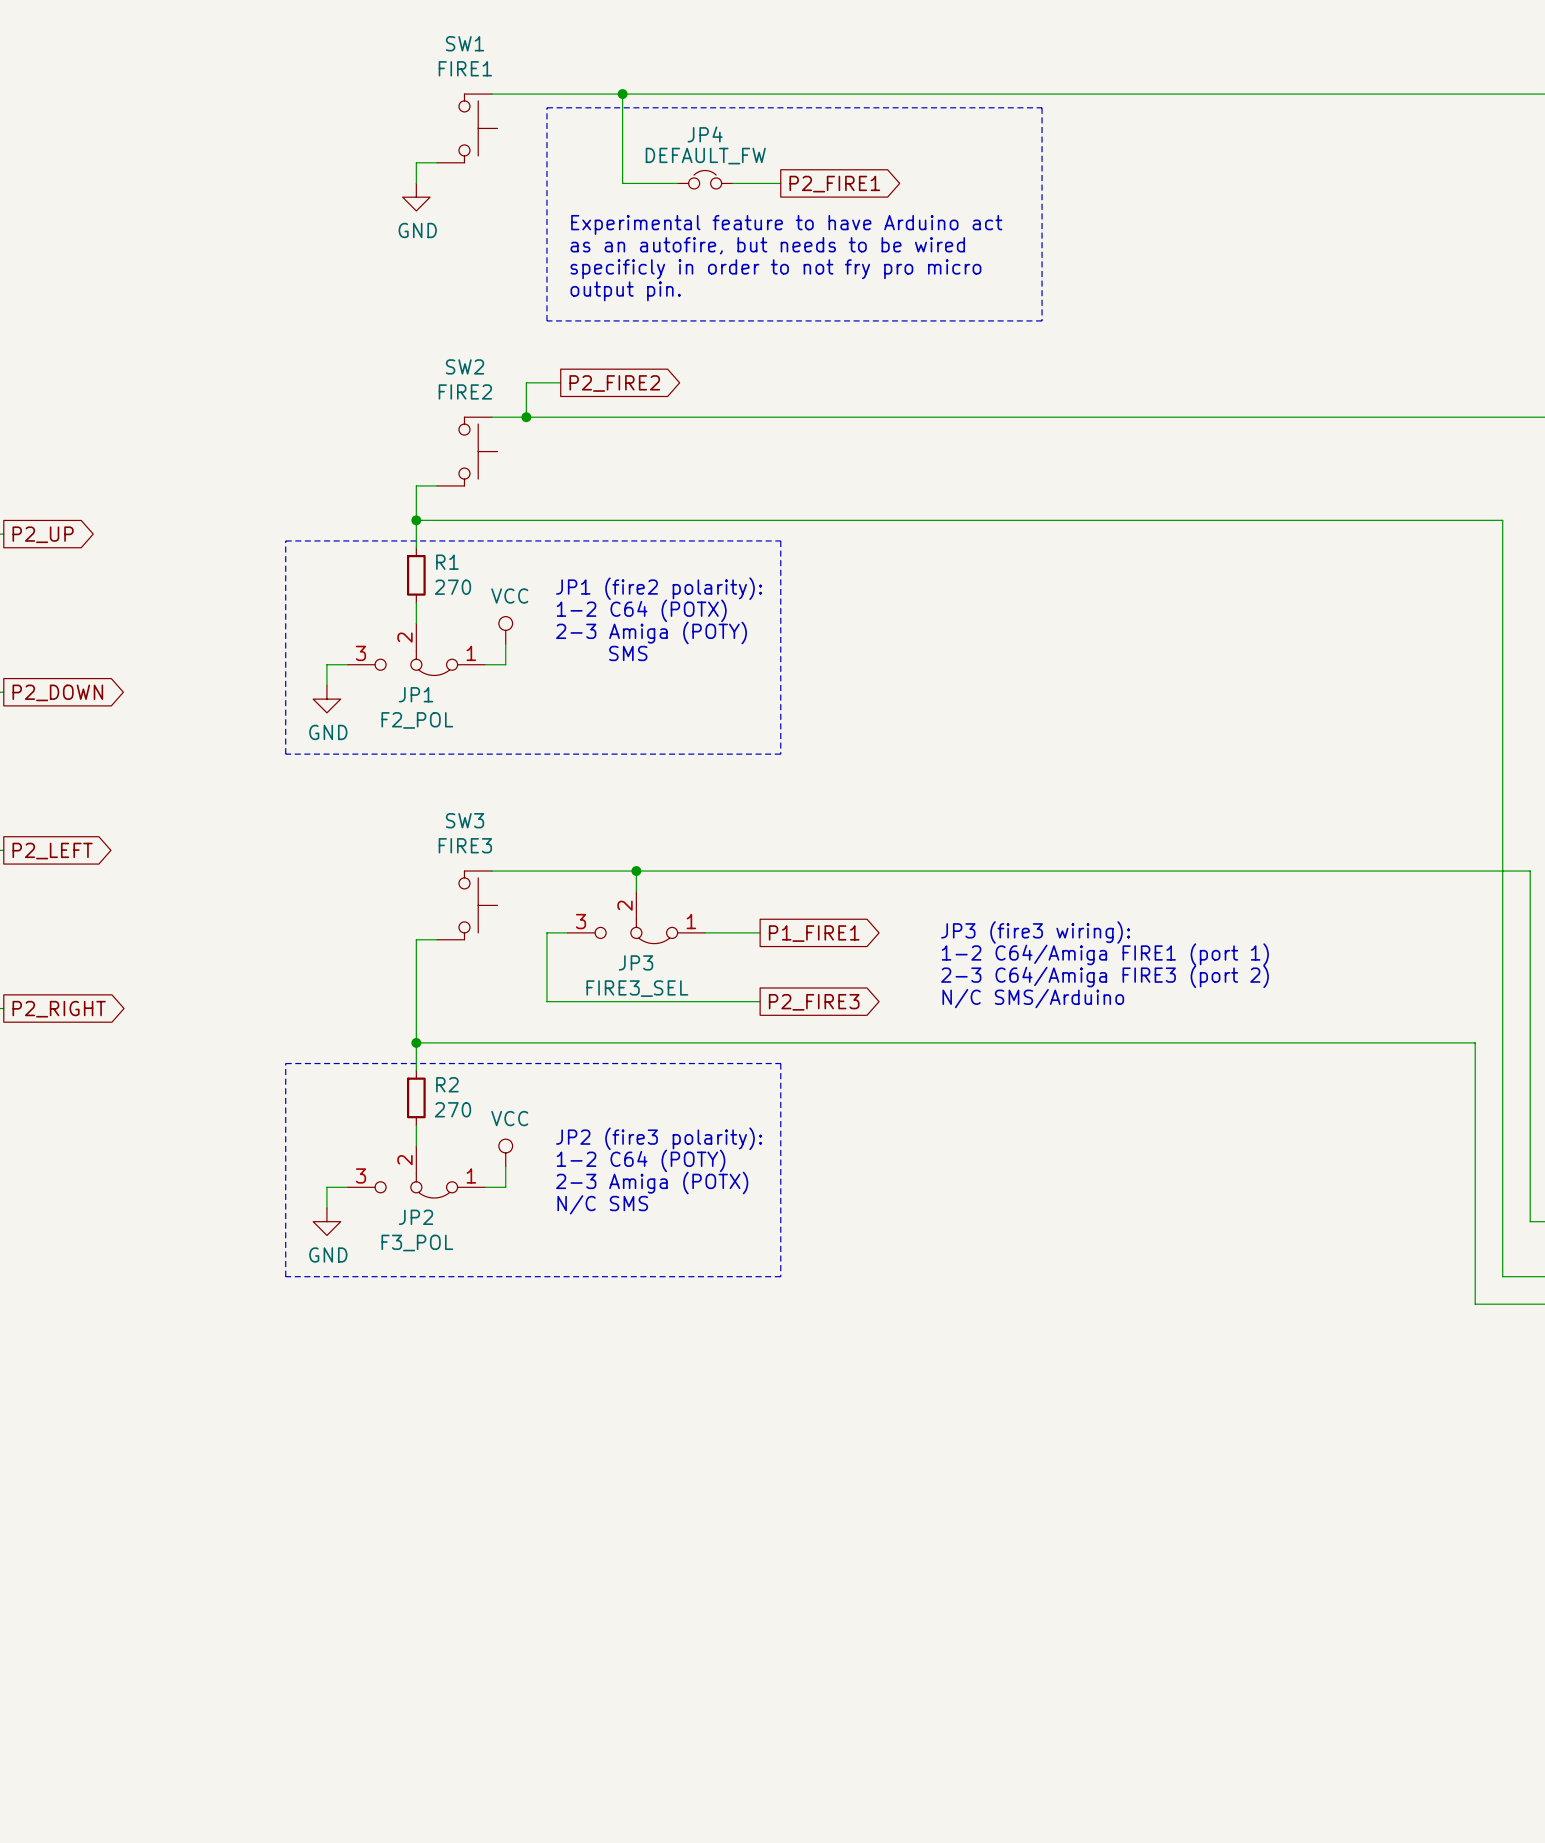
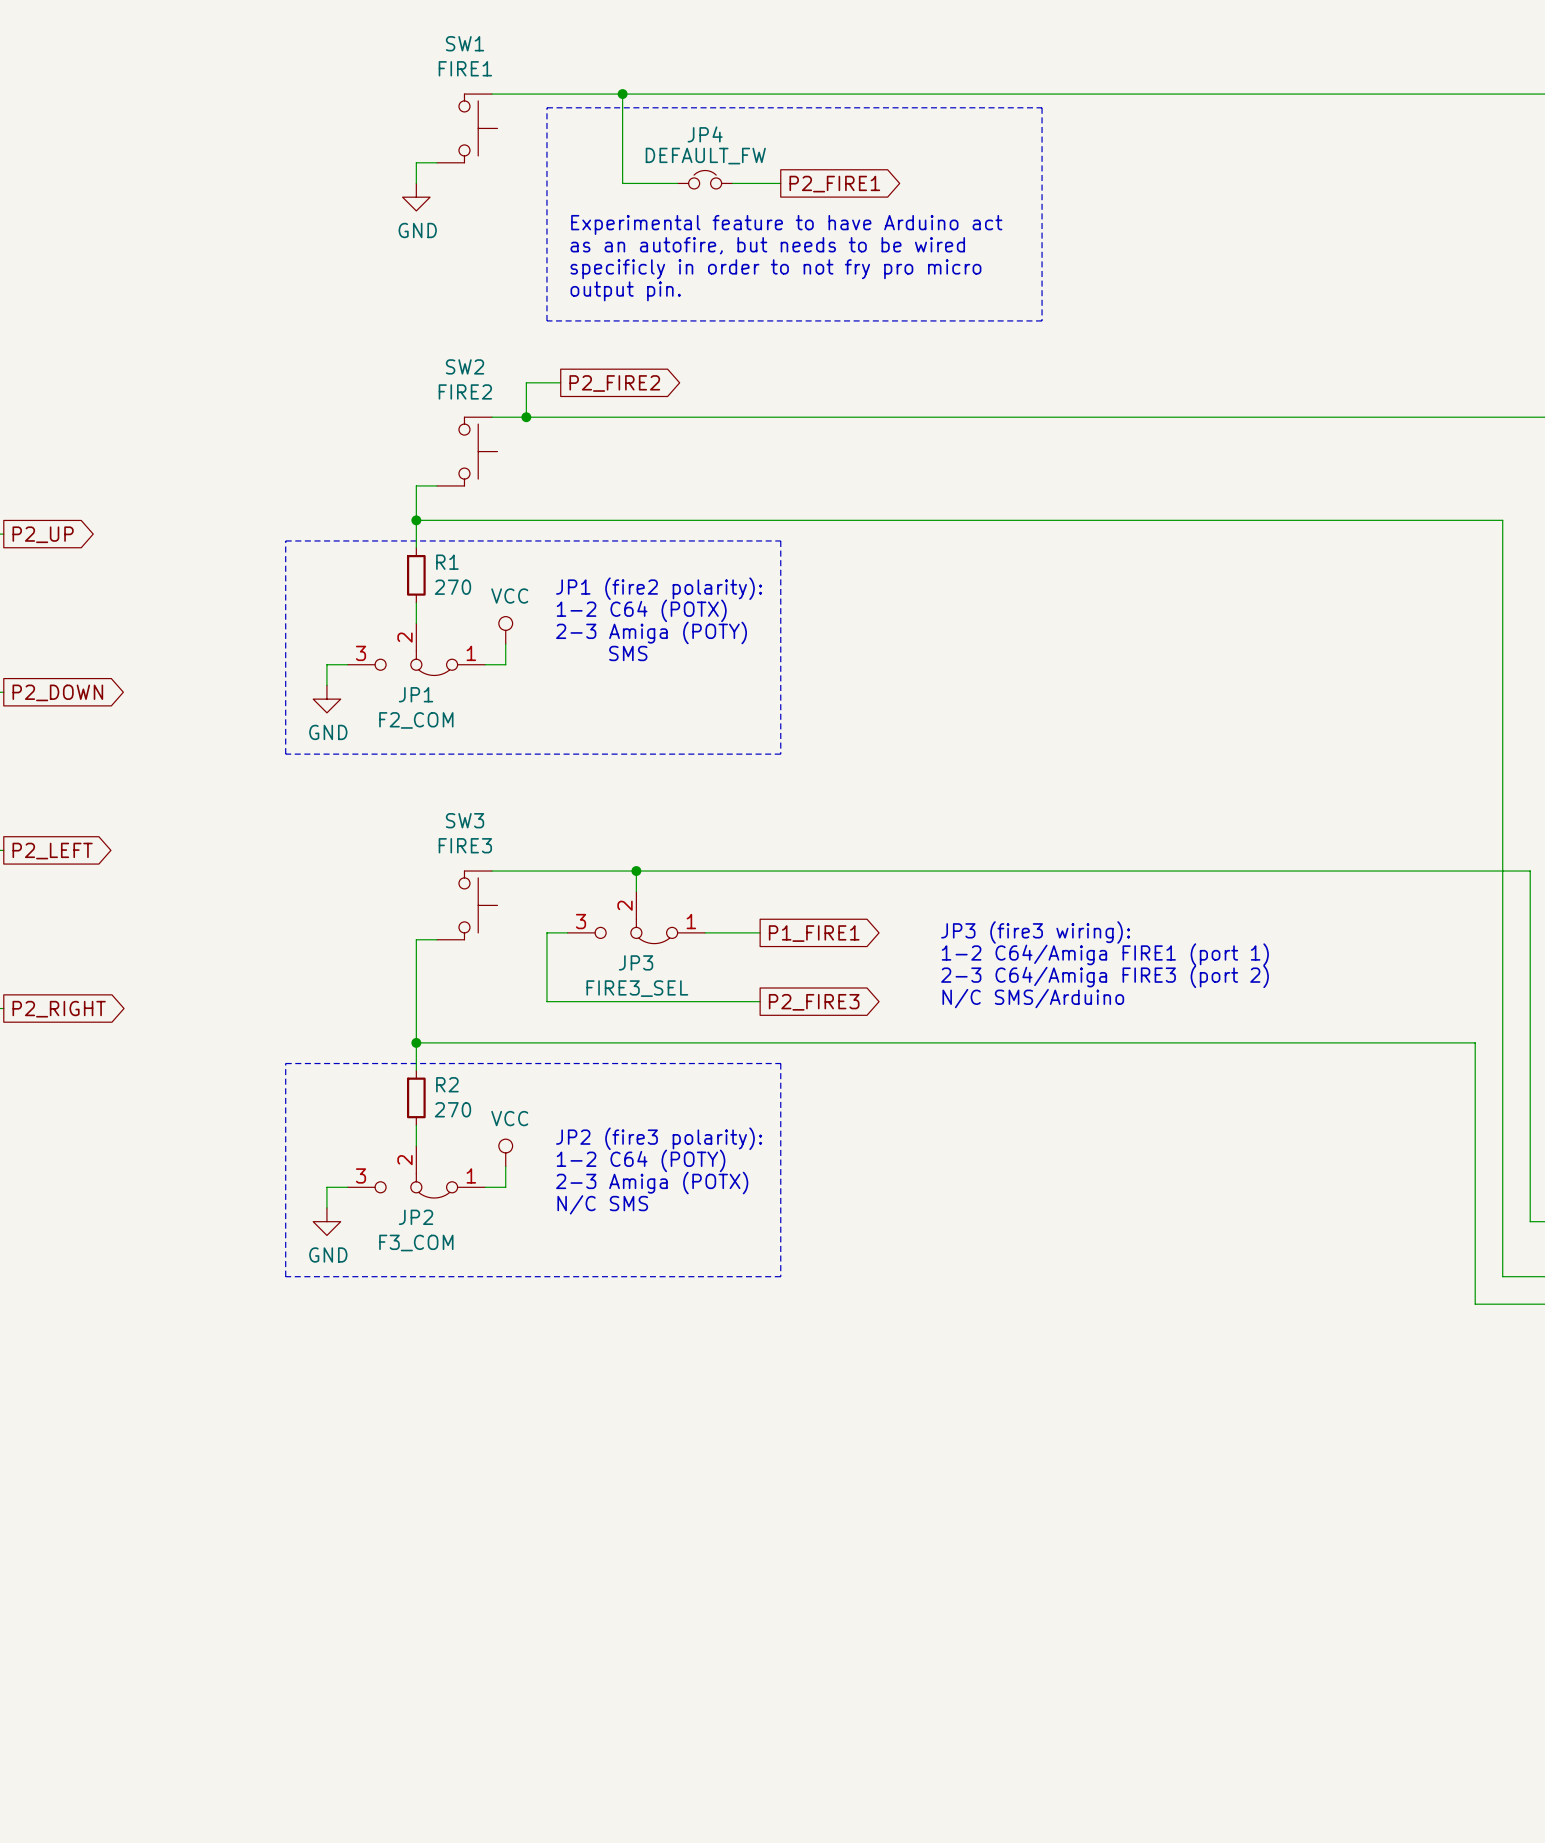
JP1 value: F2_POL (417, 720) -> F2_COM (416, 720)
JP2 value: F3_POL (417, 1243) -> F3_COM (416, 1243)

